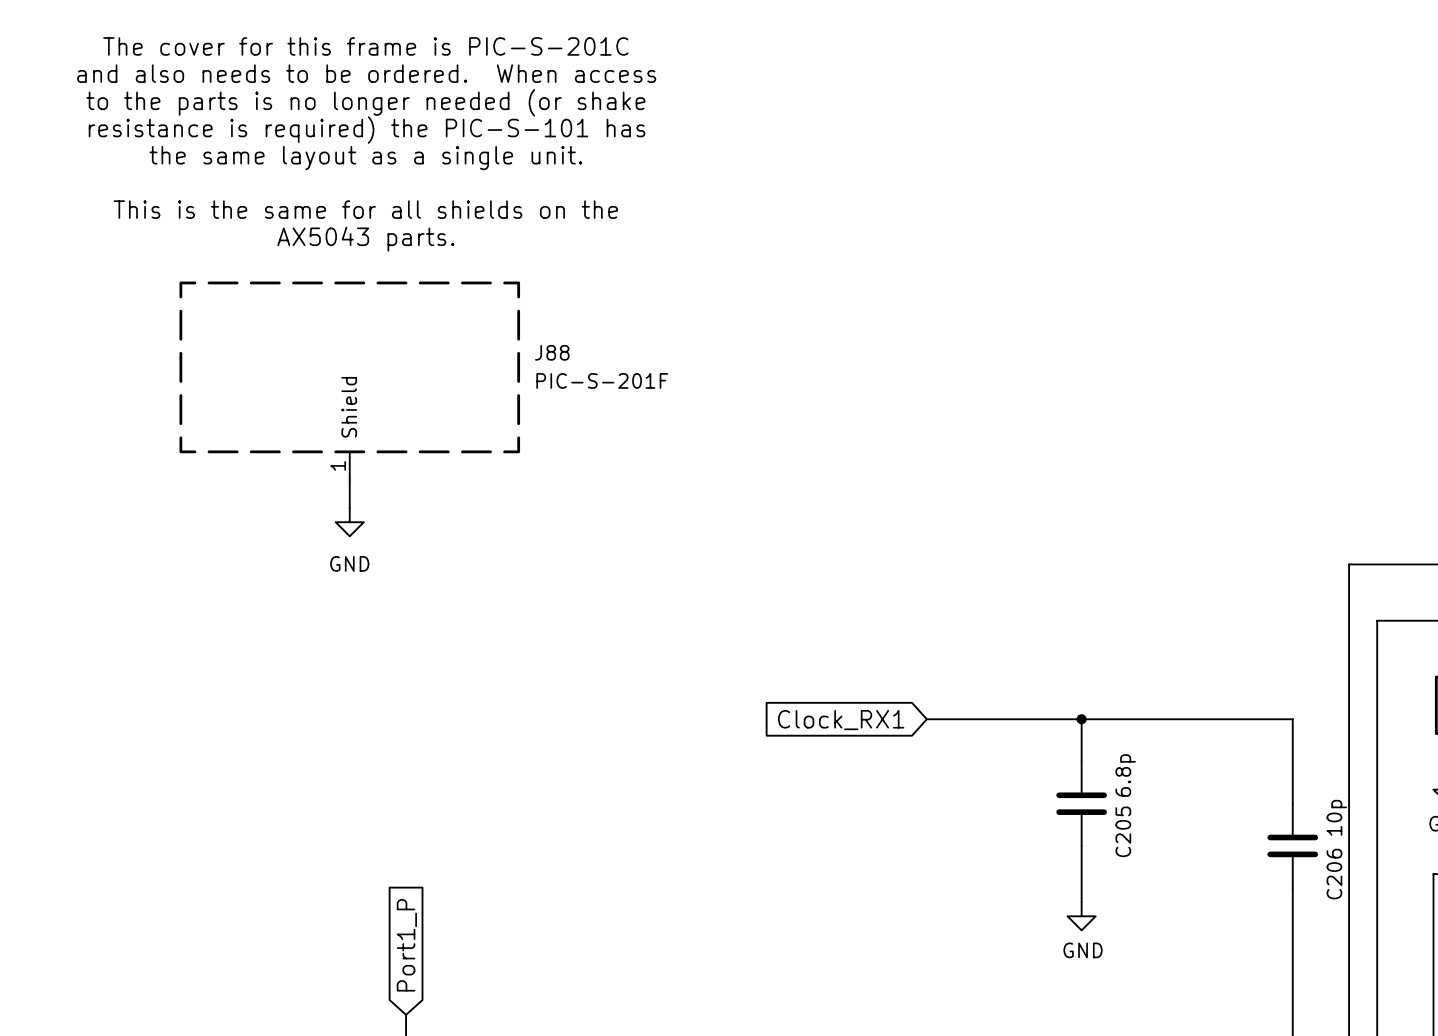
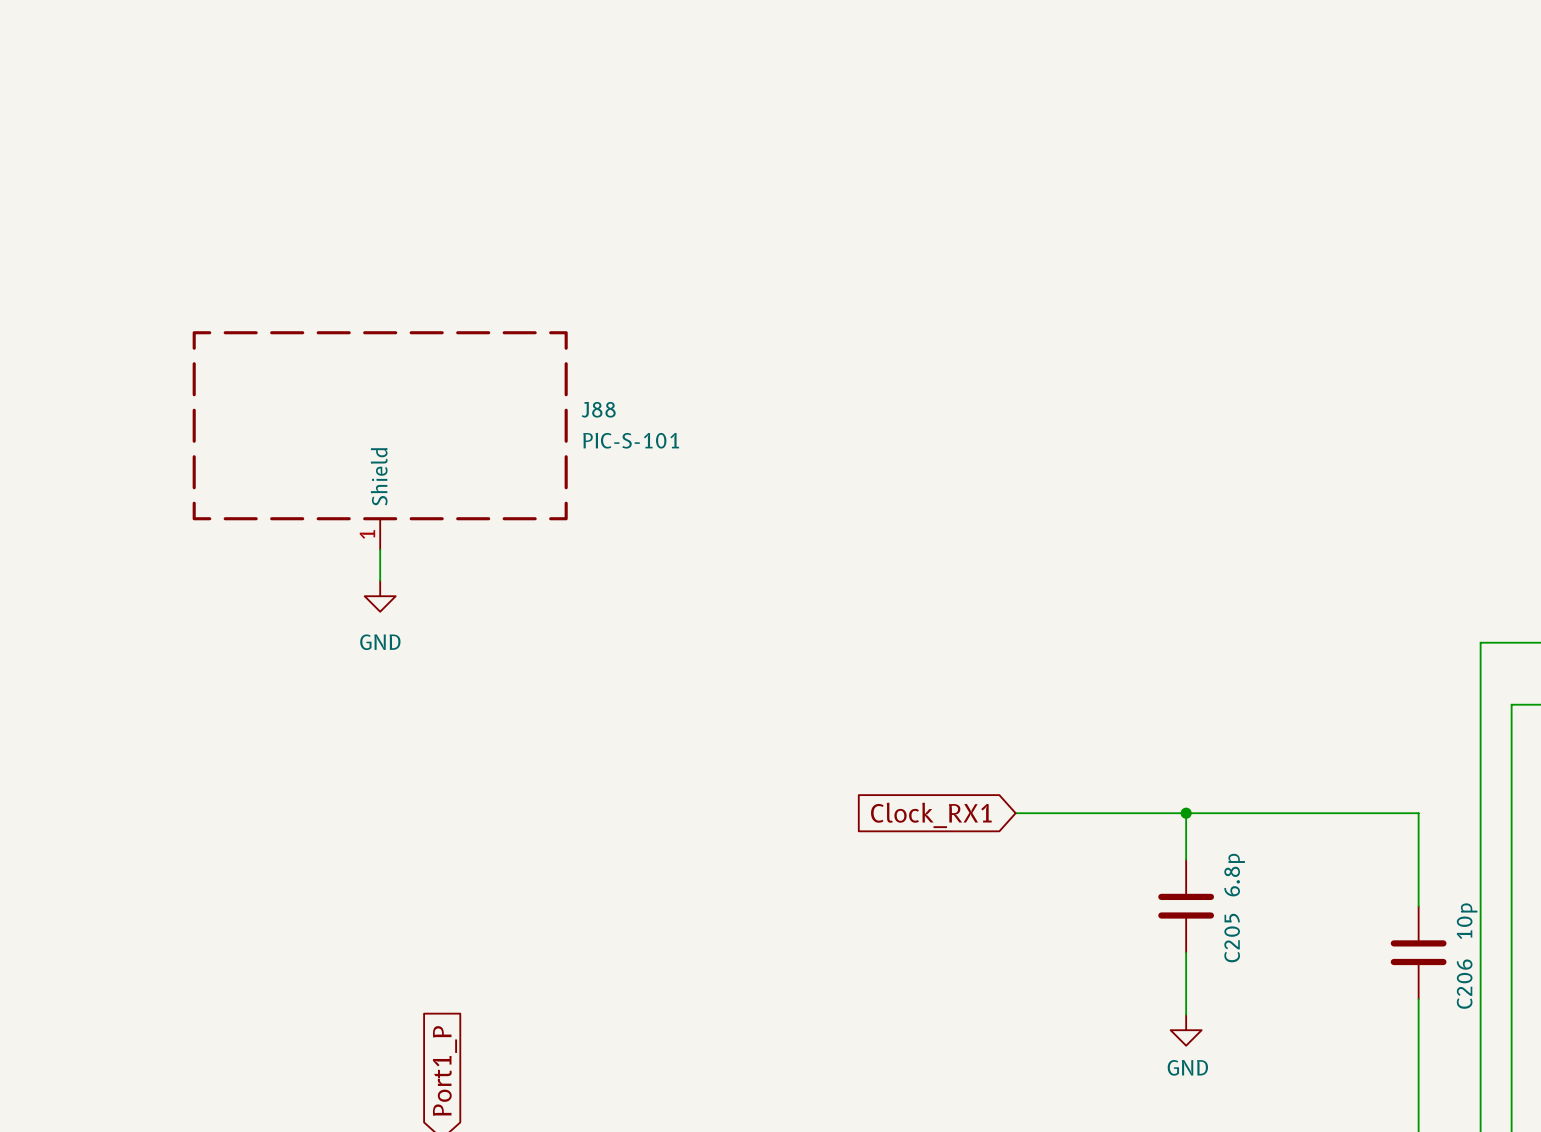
text: The cover for this frame is PIC-S-201C (365, 46) -> none
text: and also needs to be ordered. When access (366, 73) -> none
text: to the parts is no longer needed (or shake (365, 102) -> none
text: resistance is required) the PIC-S-101 has (367, 130) -> none
text: the same layout as a single unit. (365, 158) -> none
text: This is the same for all shields on the (365, 209) -> none
text: AX5043 parts. (365, 239) -> none
J88 value: PIC-S-201F (602, 380) -> PIC-S-101 (631, 440)

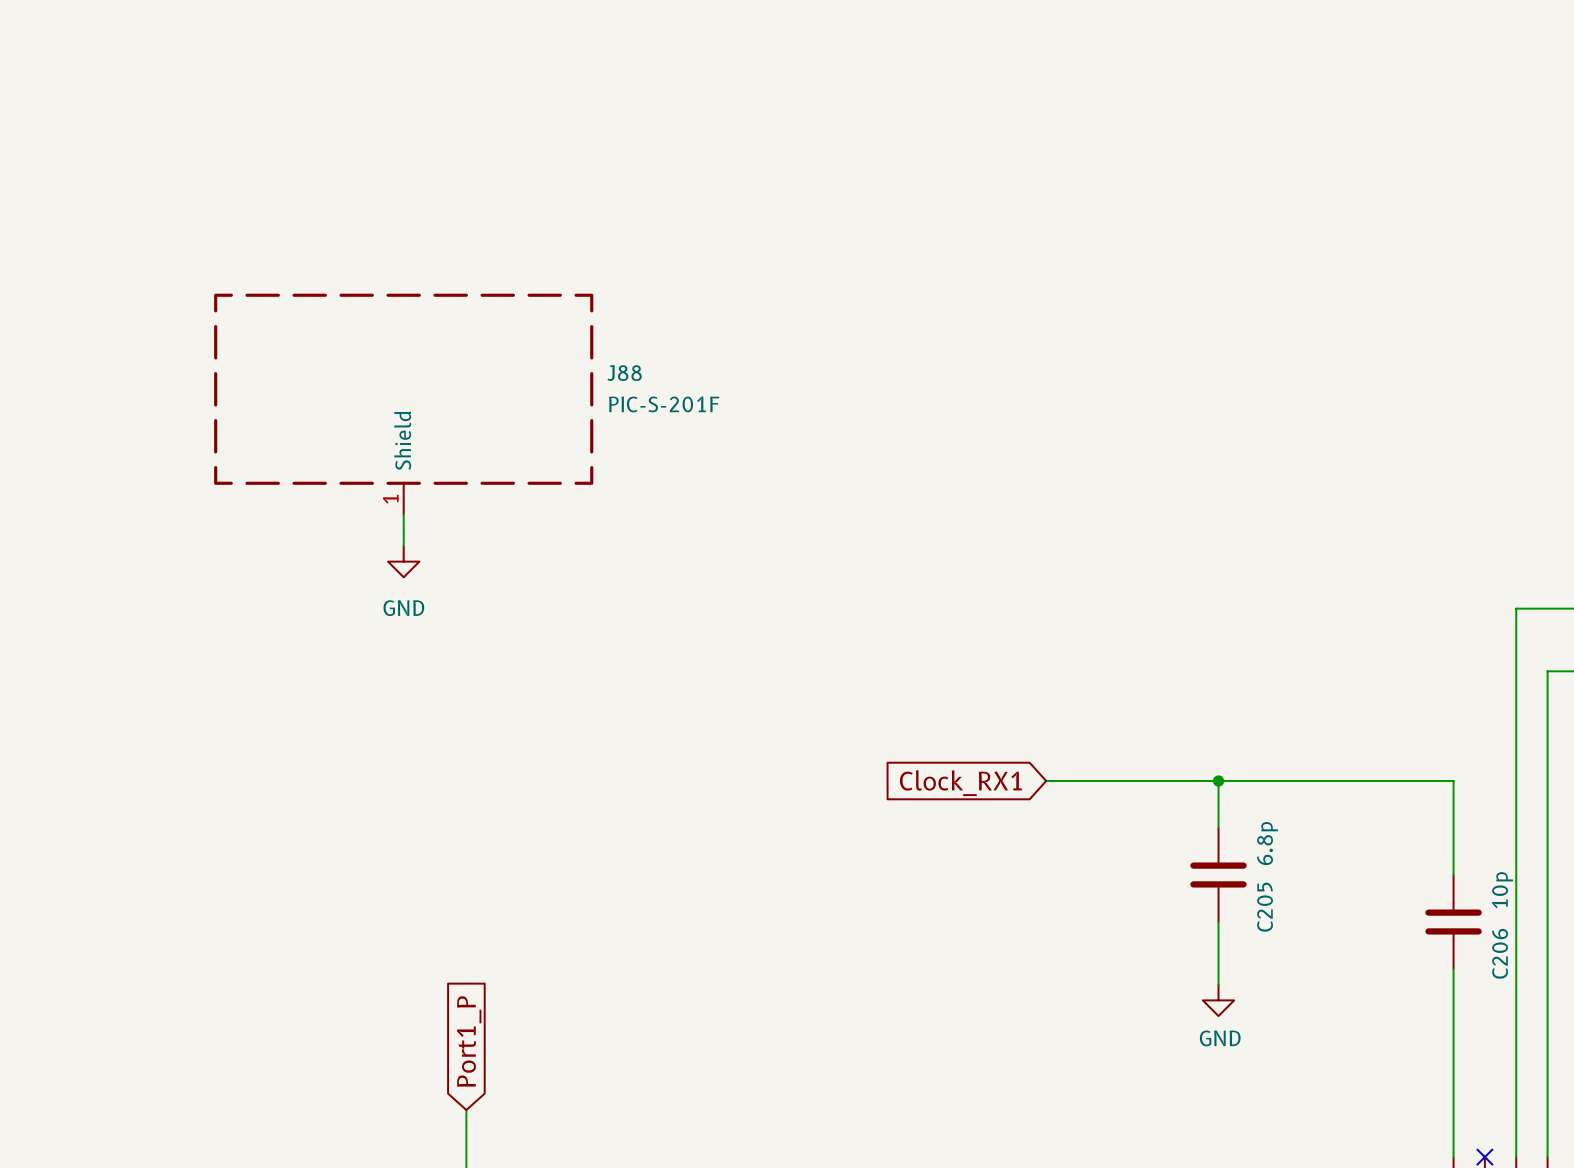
J88 value: PIC-S-101 (631, 440) -> PIC-S-201F (664, 404)

